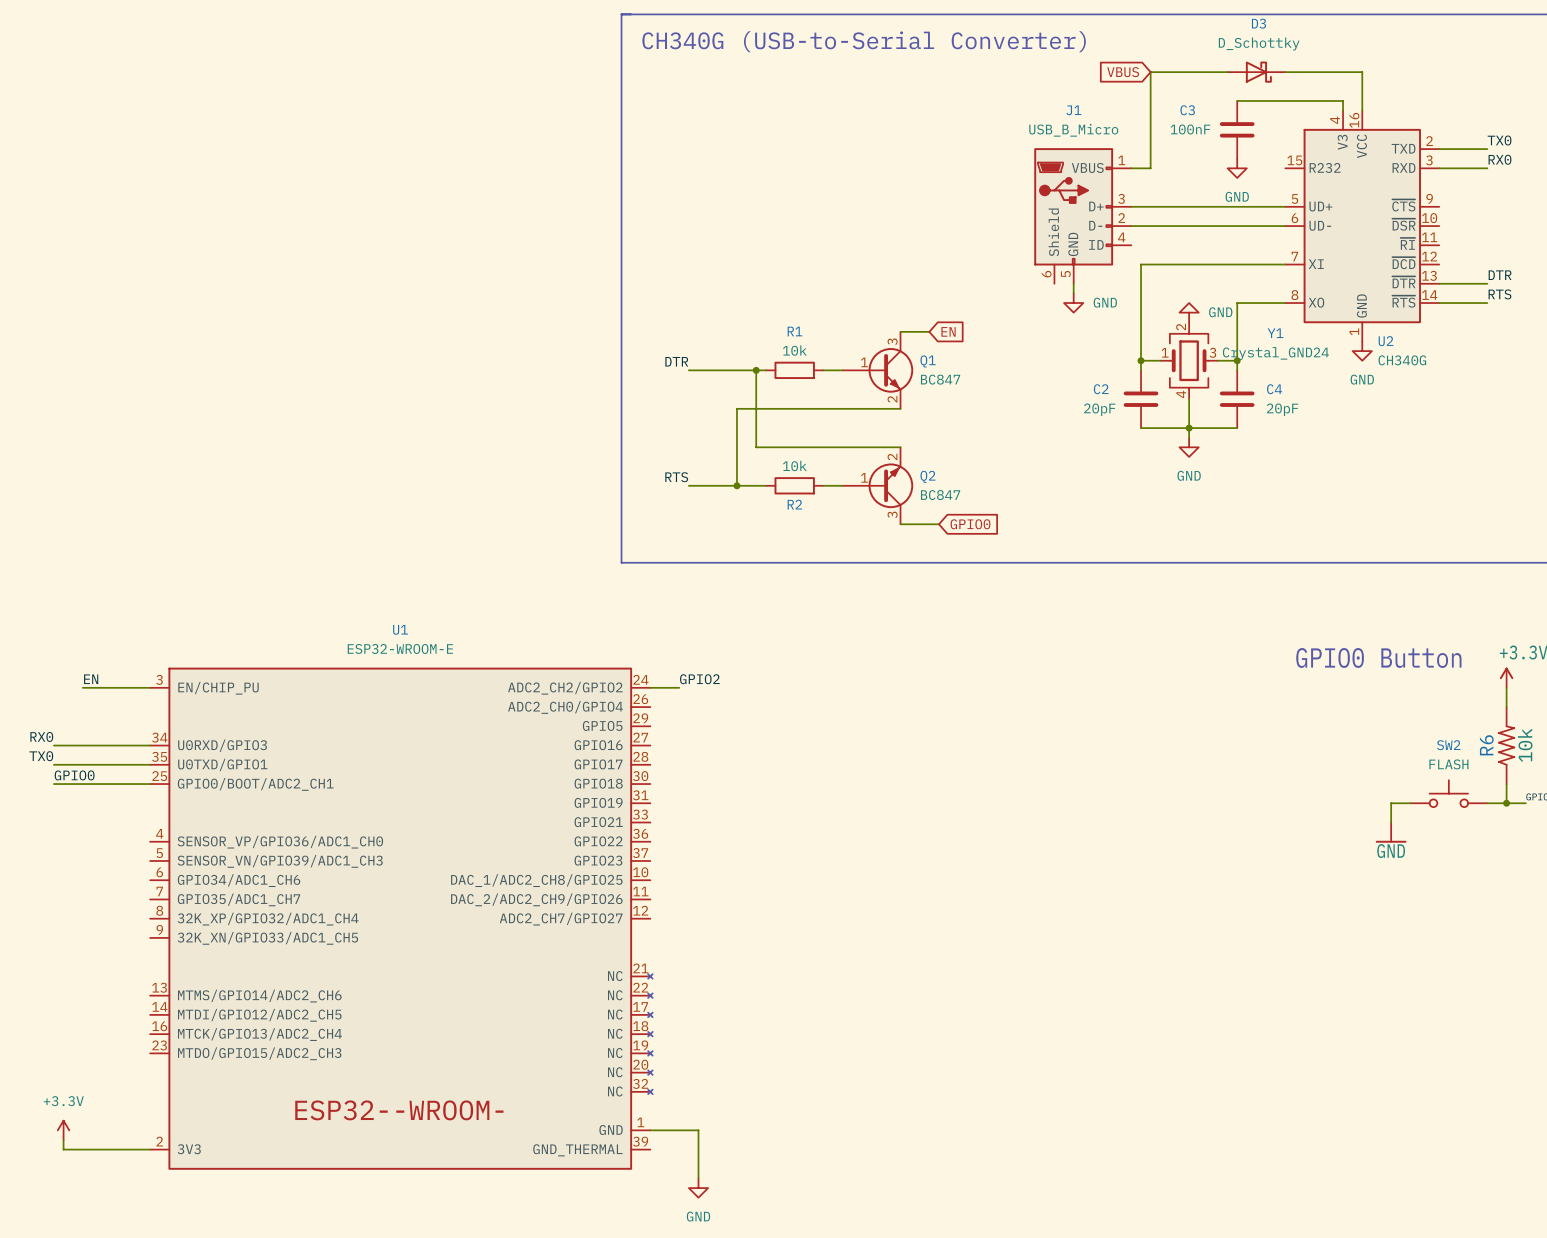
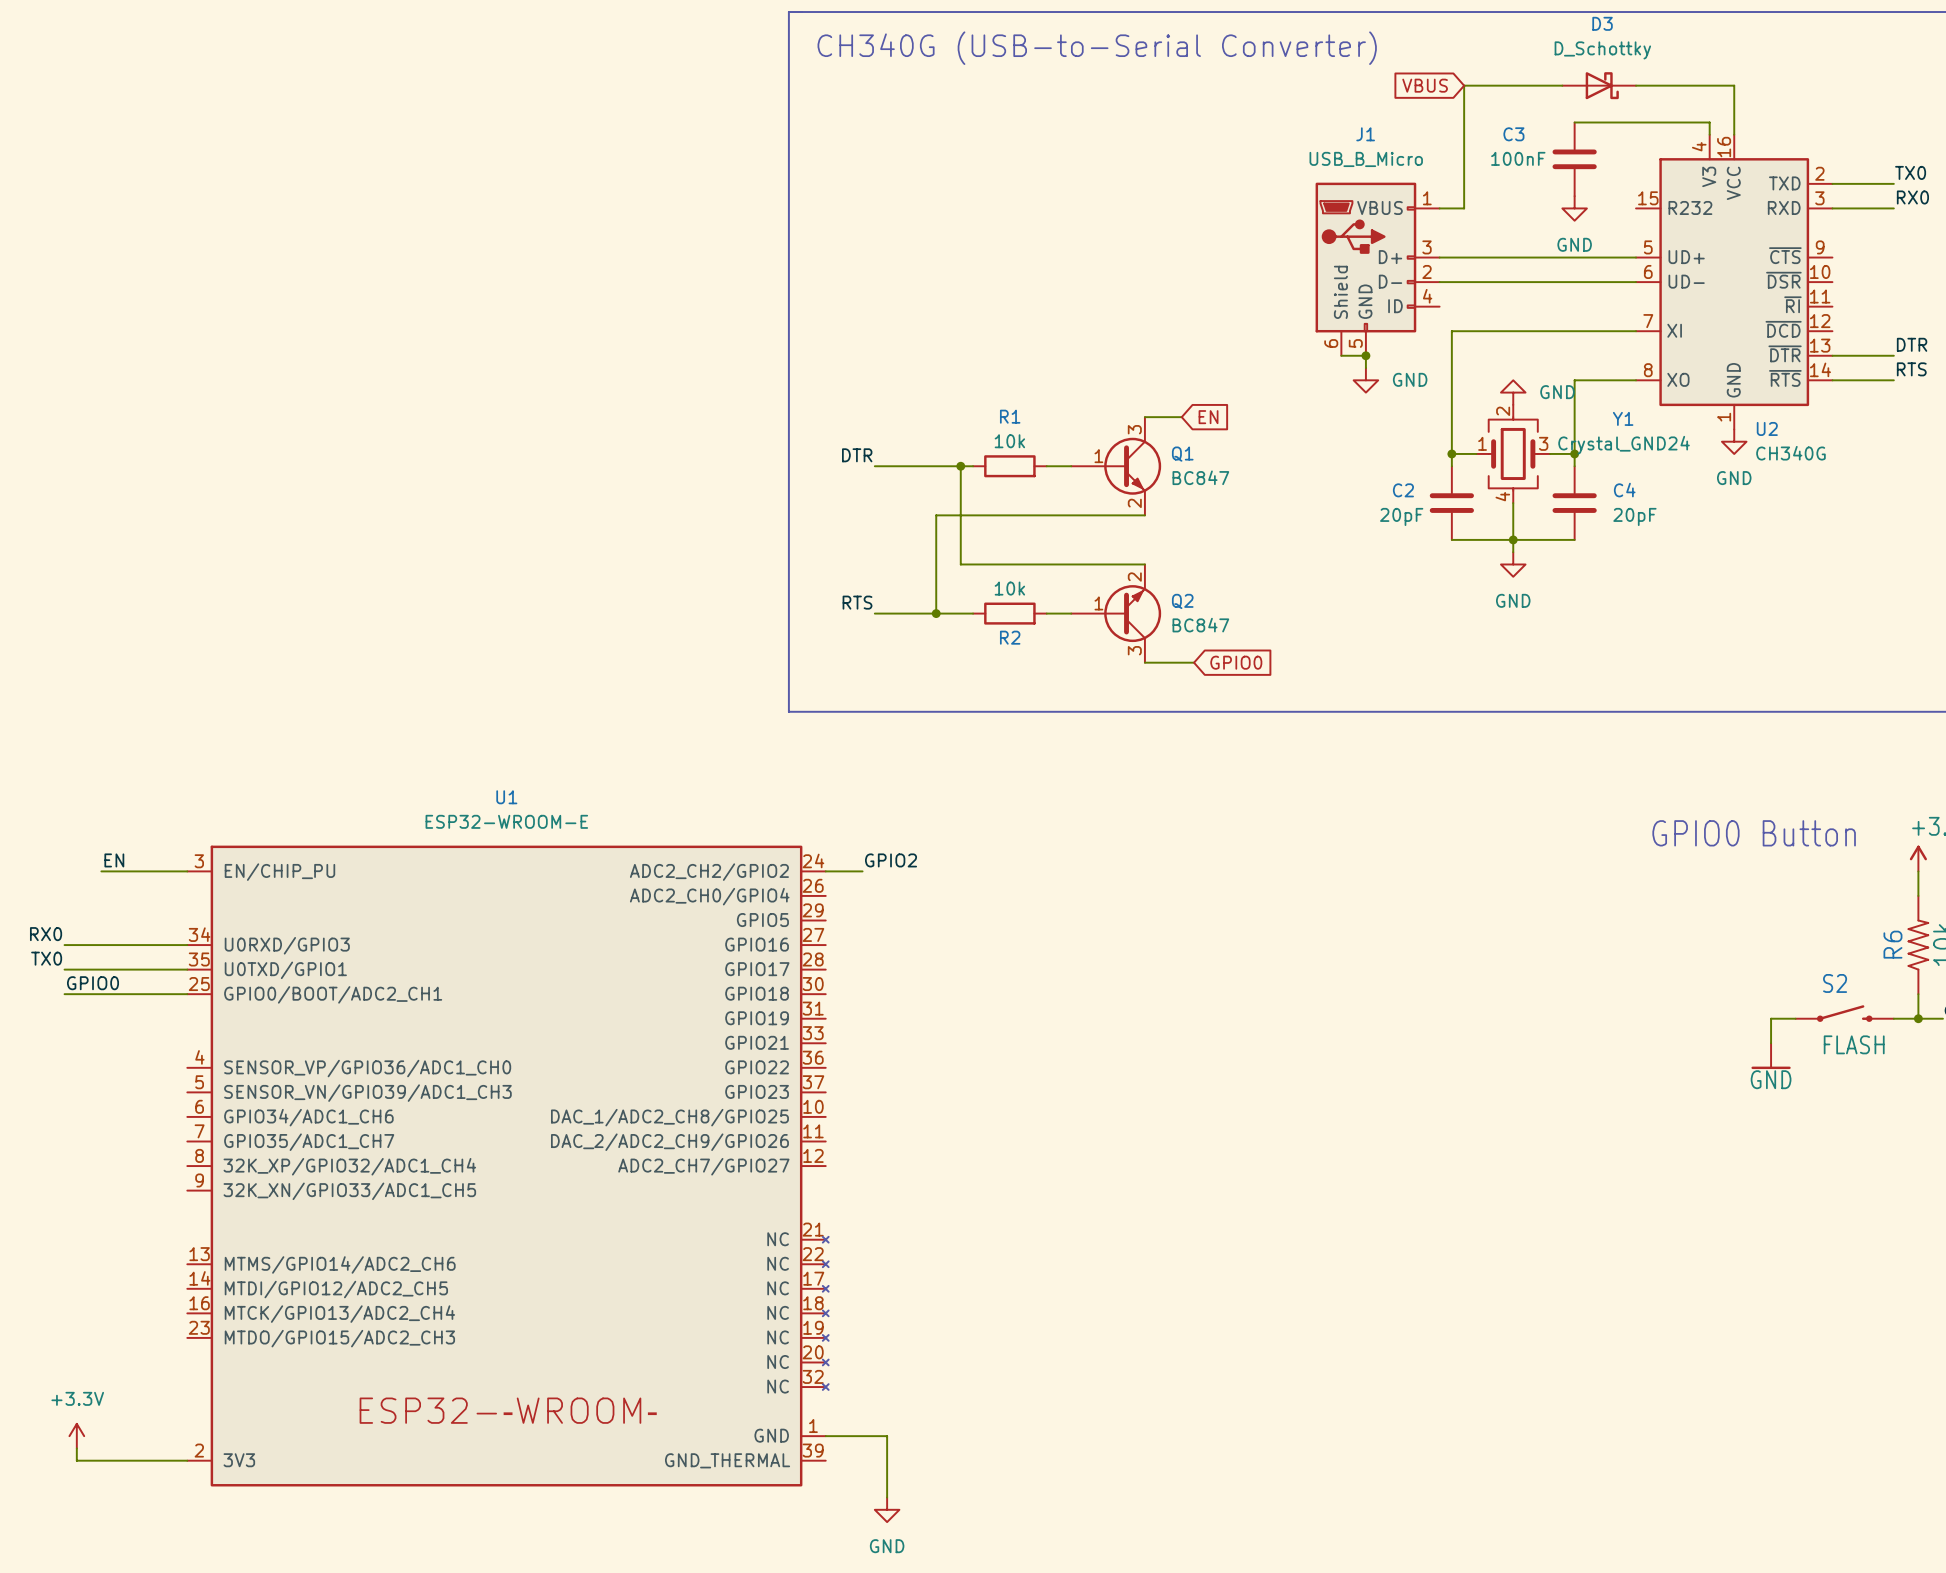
wire: none -> (1341, 355) (1365, 355)
junction: none -> (1365, 355)
SW2: FLASH (1448, 793) -> none
S2: none -> FLASH (1844, 1013)

